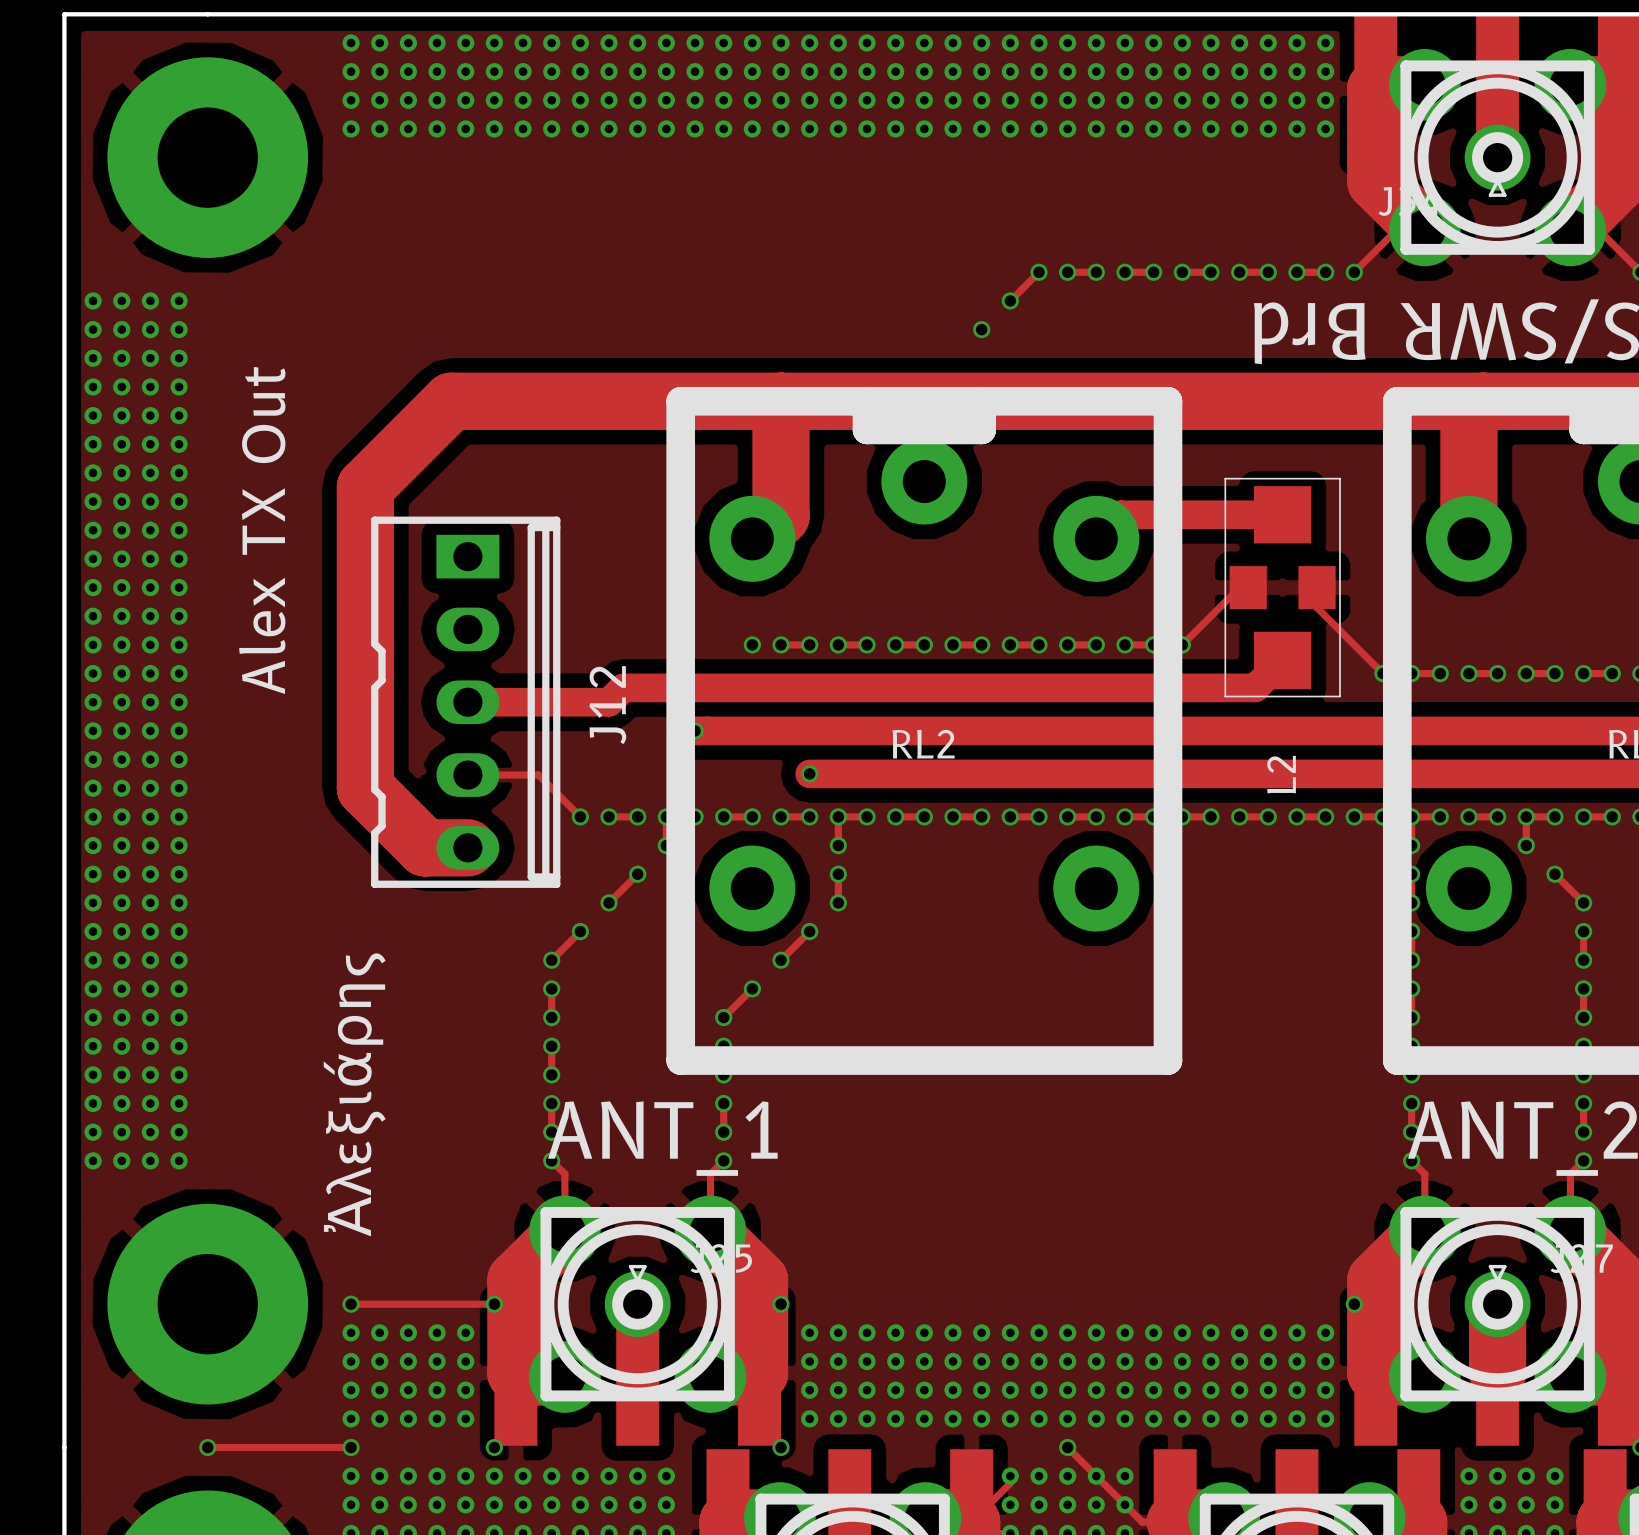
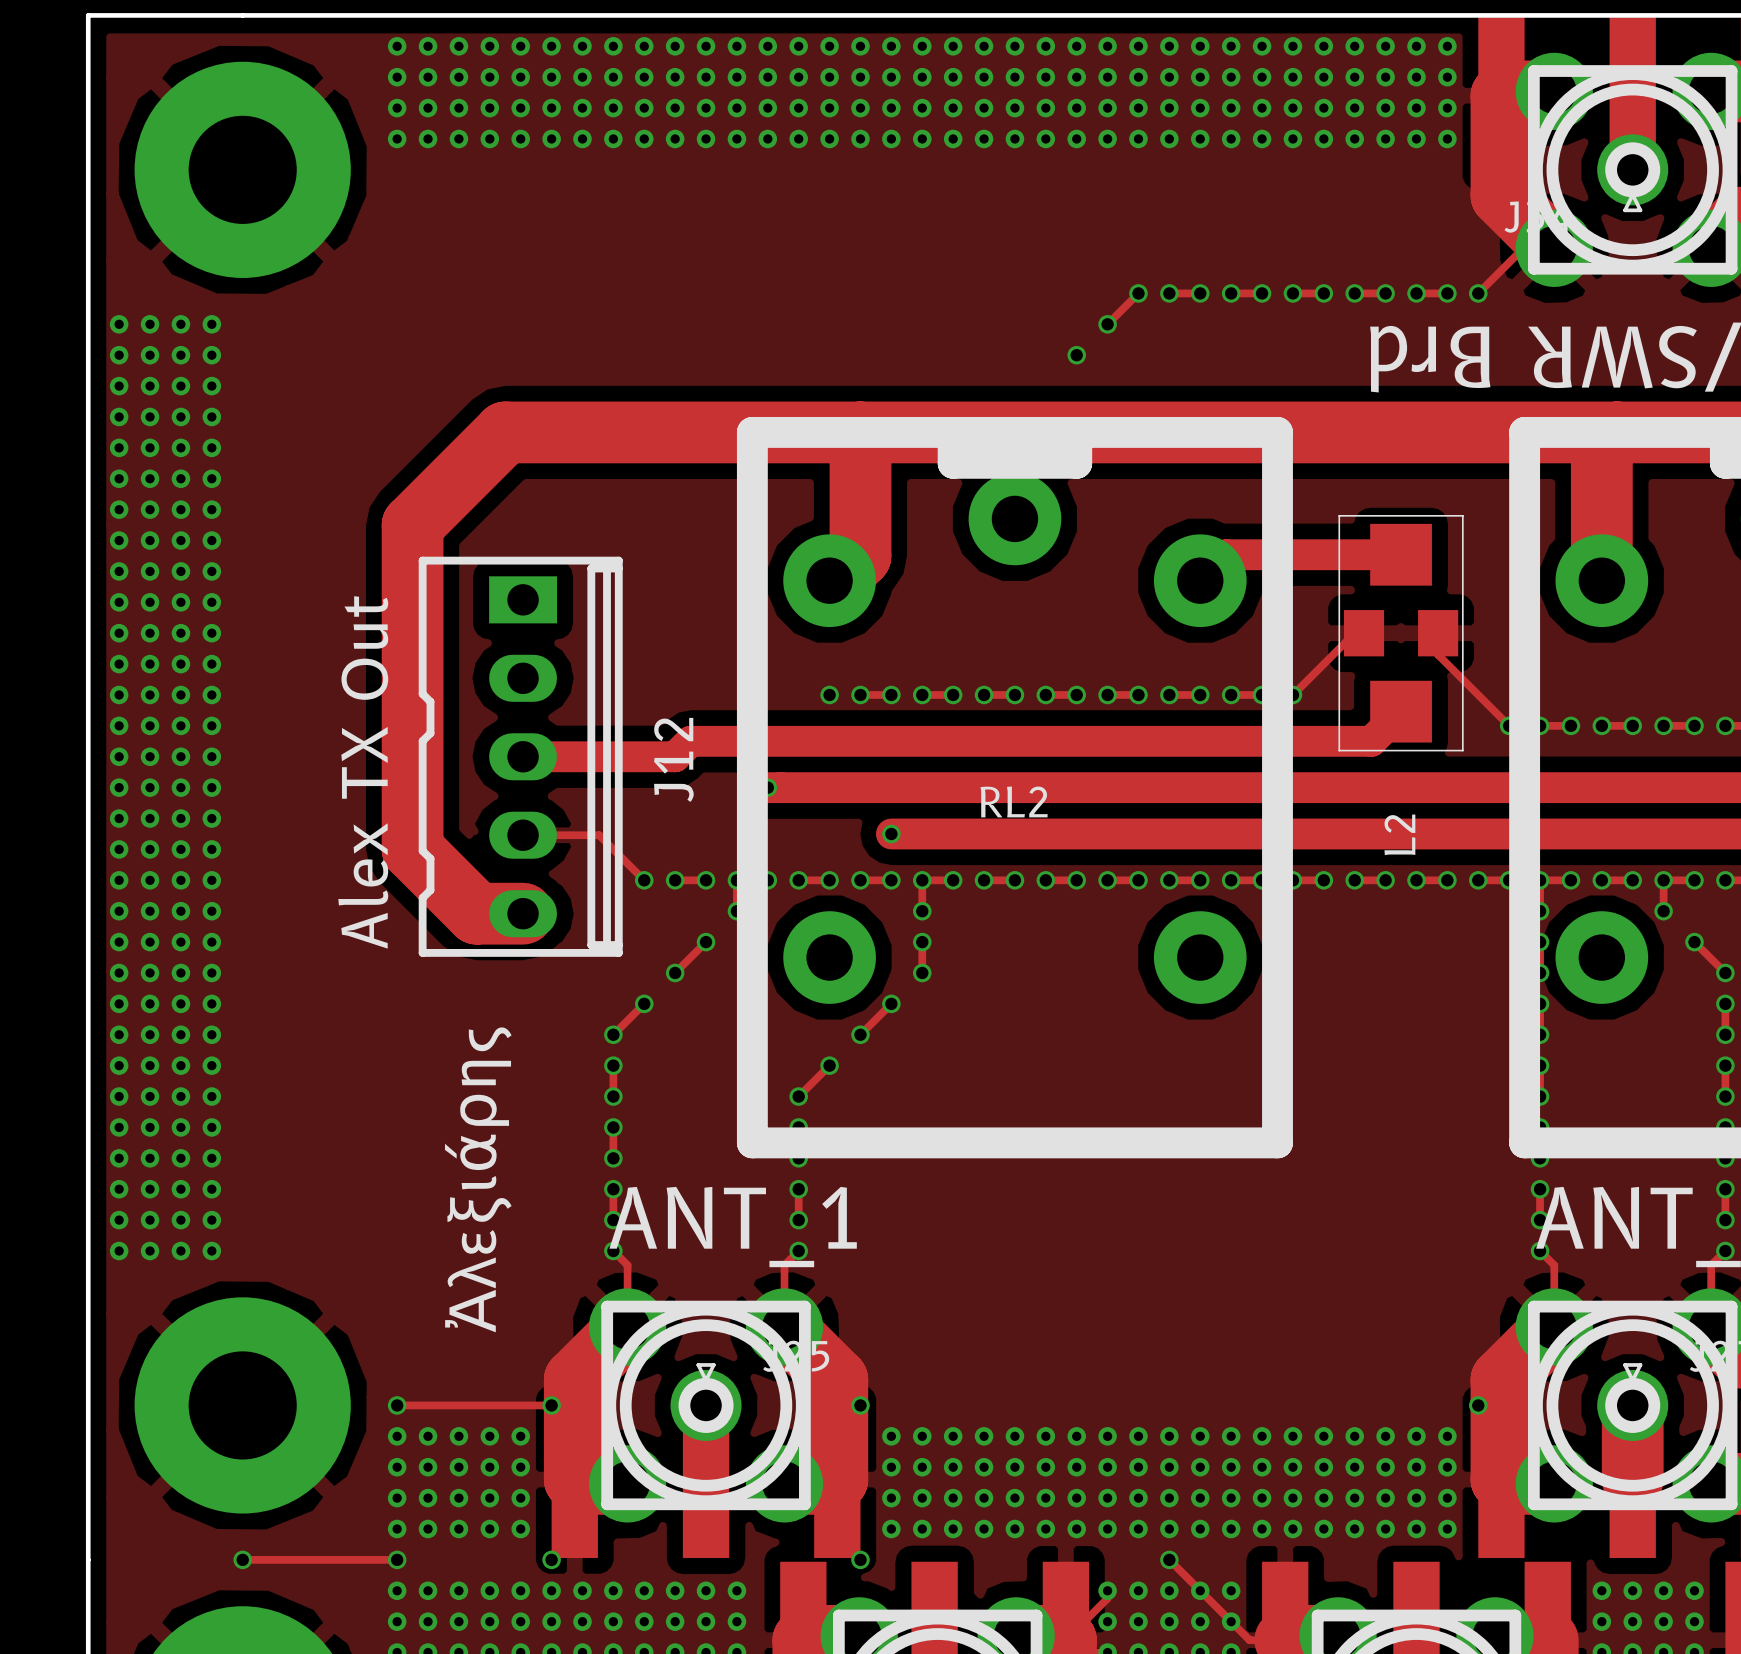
text position: Alex TX Out (262, 530) -> Alex TX Out (363, 772)
text position: Ἀλεξιάρης (354, 1094) -> Ἀλεξιάρης (478, 1179)

